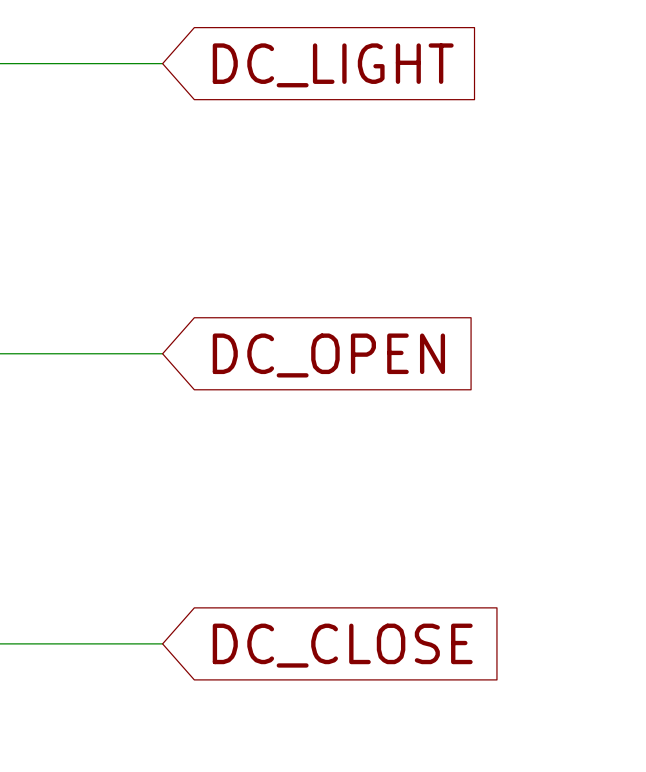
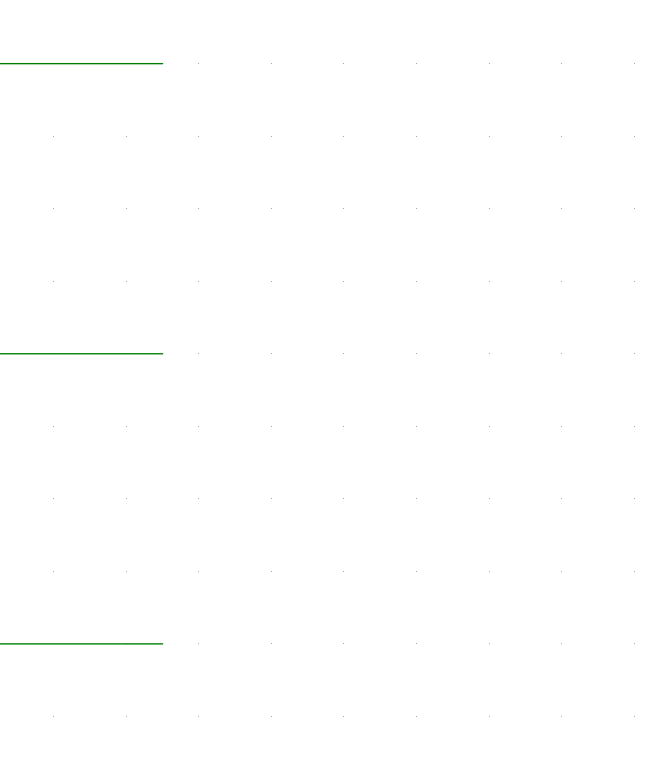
global label: DC_LIGHT (333, 65) -> none
global label: DC_OPEN (328, 355) -> none
global label: DC_CLOSE (342, 645) -> none

